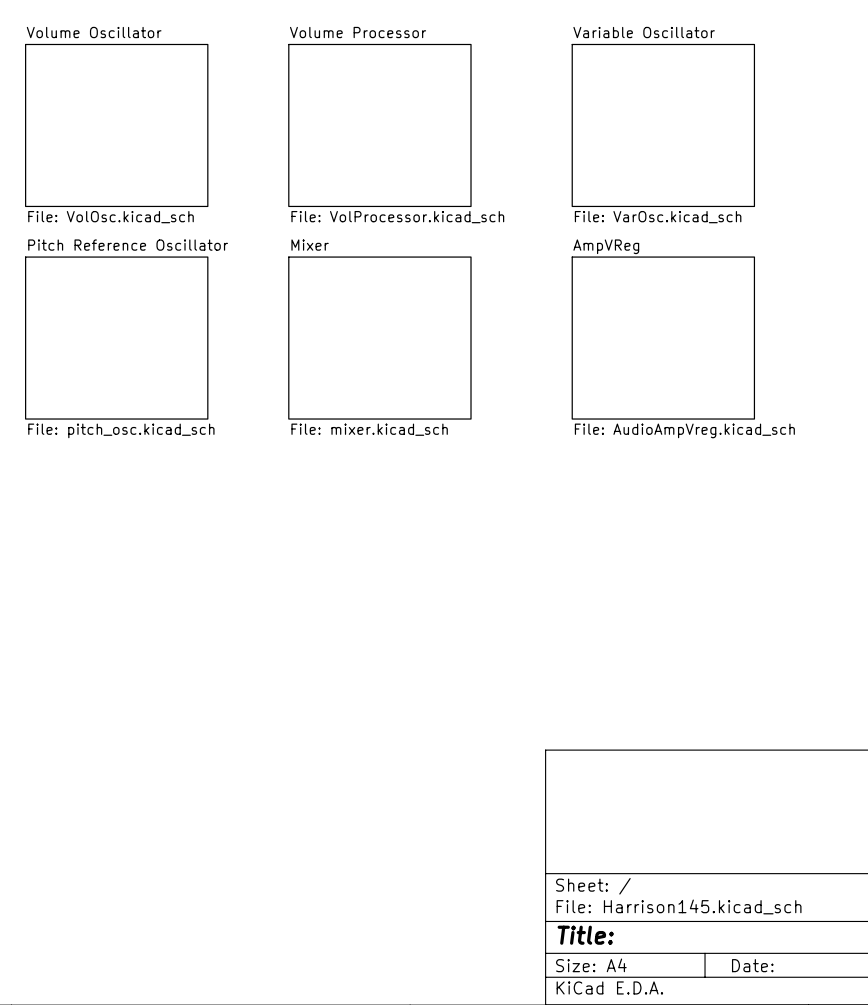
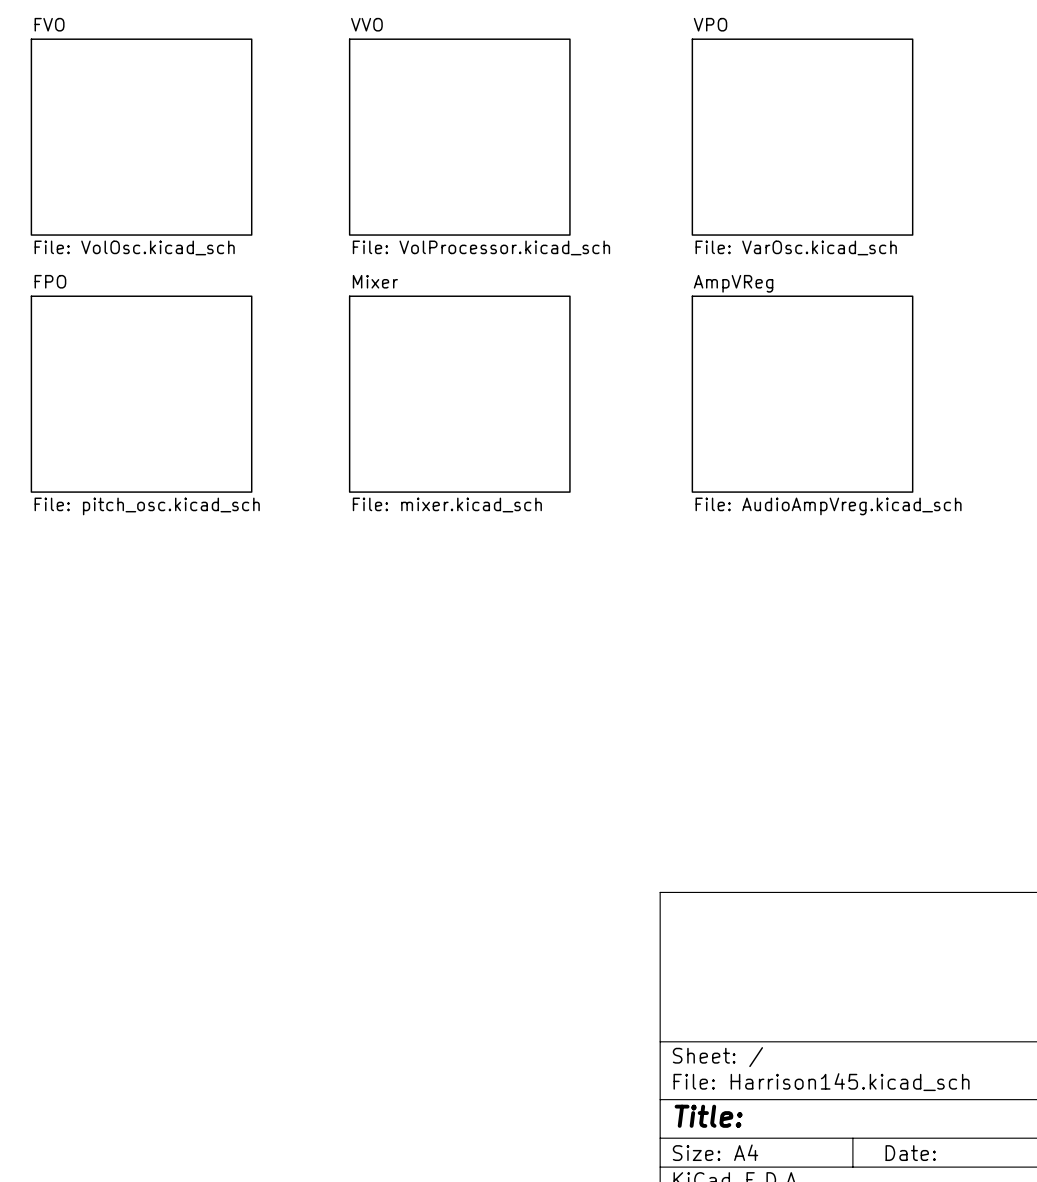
sheet Volume Oscillator name: Volume Oscillator (94, 32) -> FVO (49, 24)
sheet Volume Processor name: Volume Processor (358, 32) -> VVO (366, 24)
sheet Variable Oscillator name: Variable Oscillator (644, 32) -> VPO (710, 24)
sheet Pitch Reference Oscillator name: Pitch Reference Oscillator (128, 245) -> FPO (50, 281)

